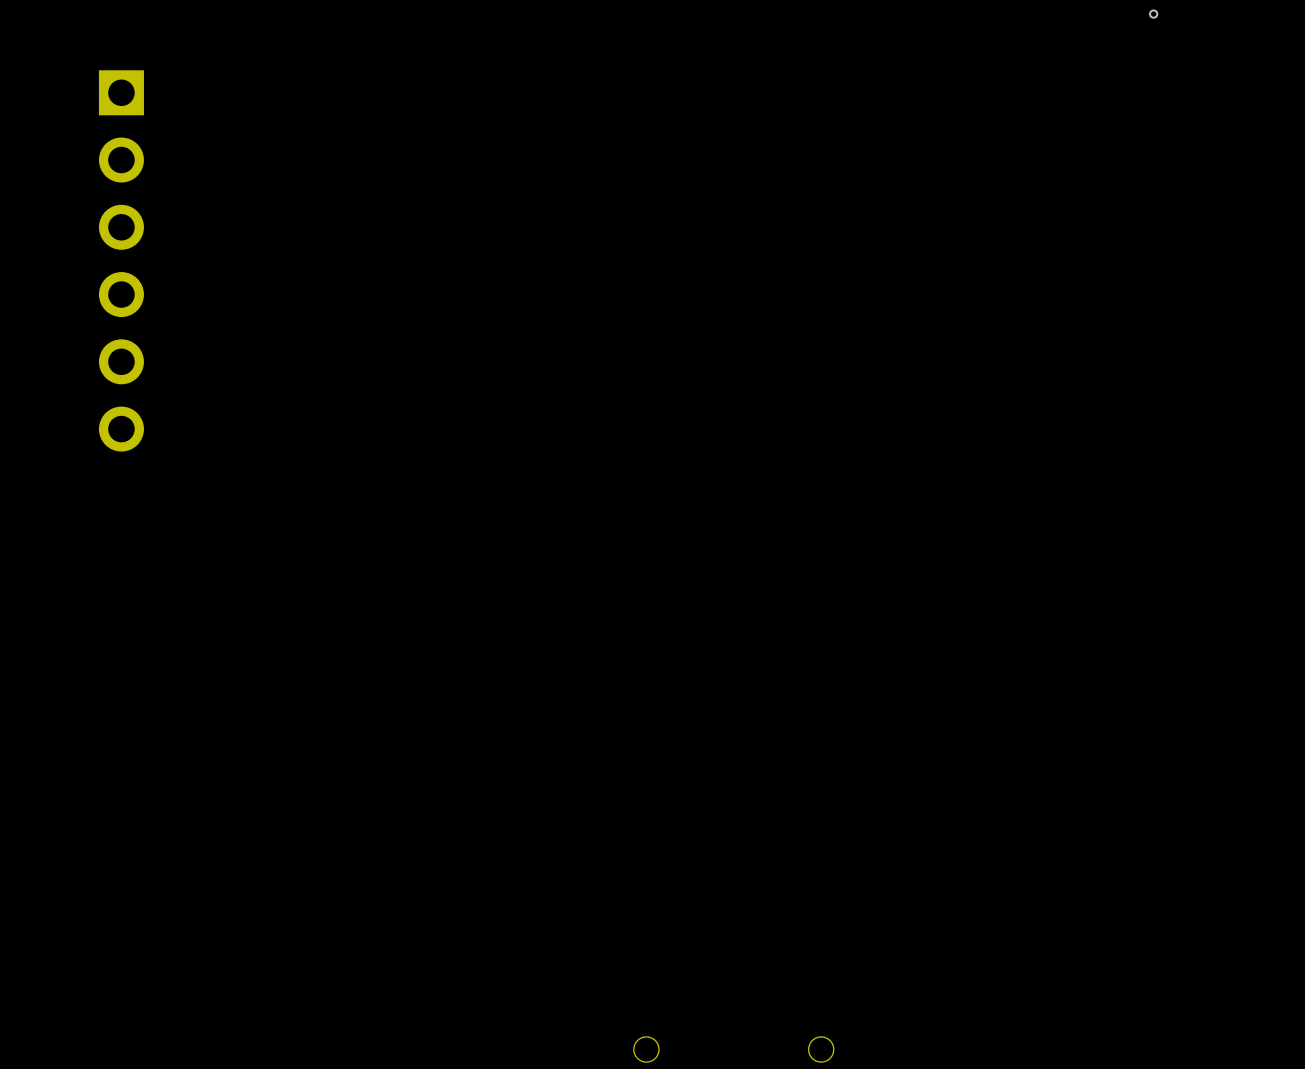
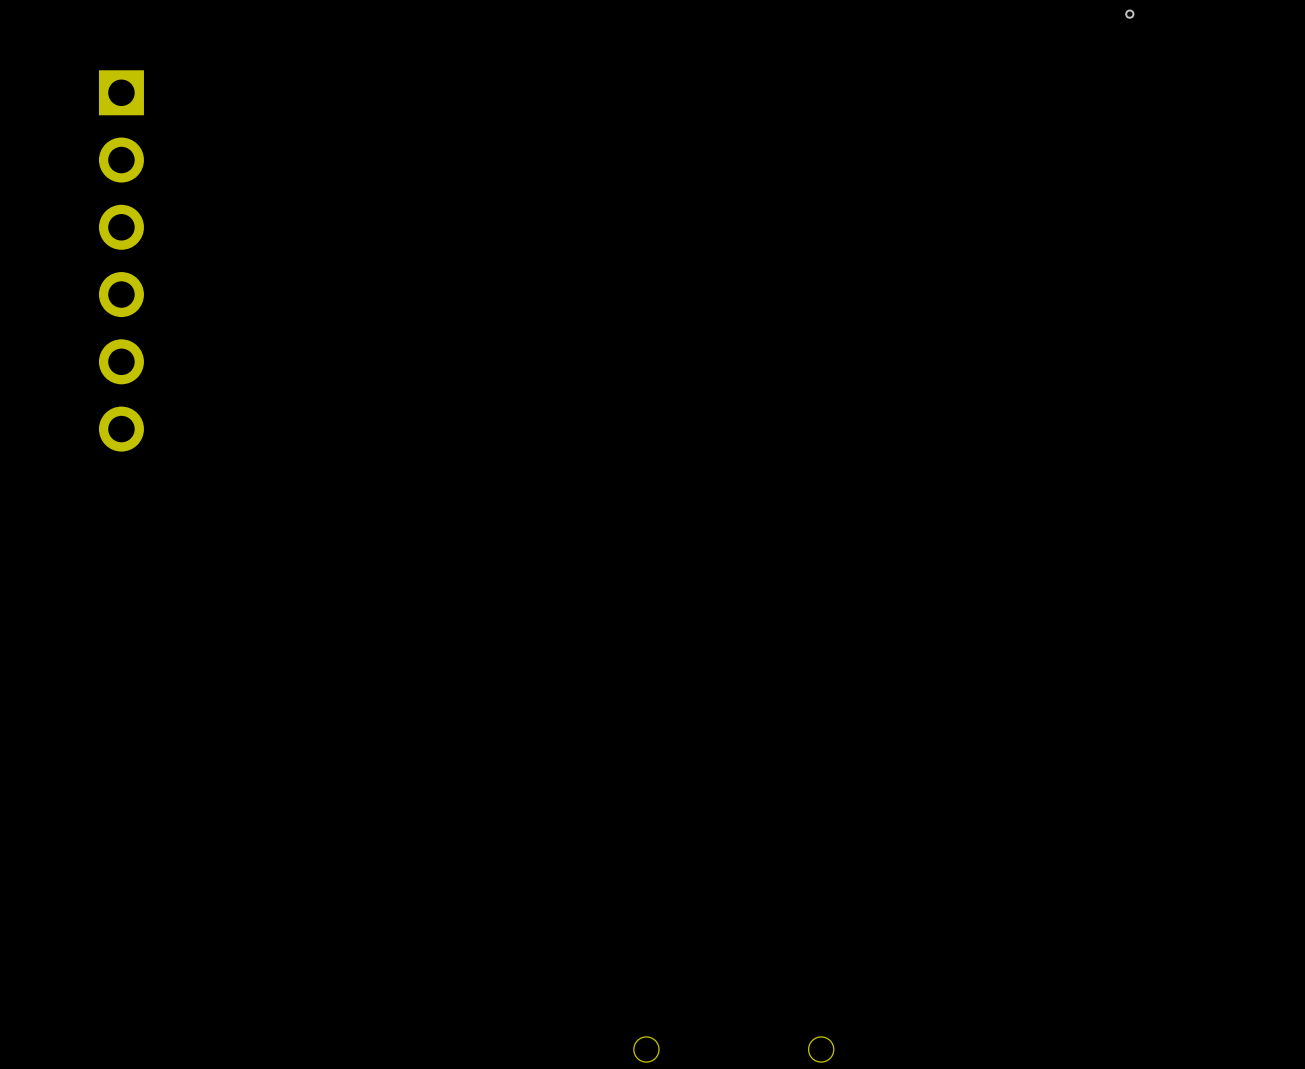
via: none -> (1129, 14)
via: (1153, 14) -> none

